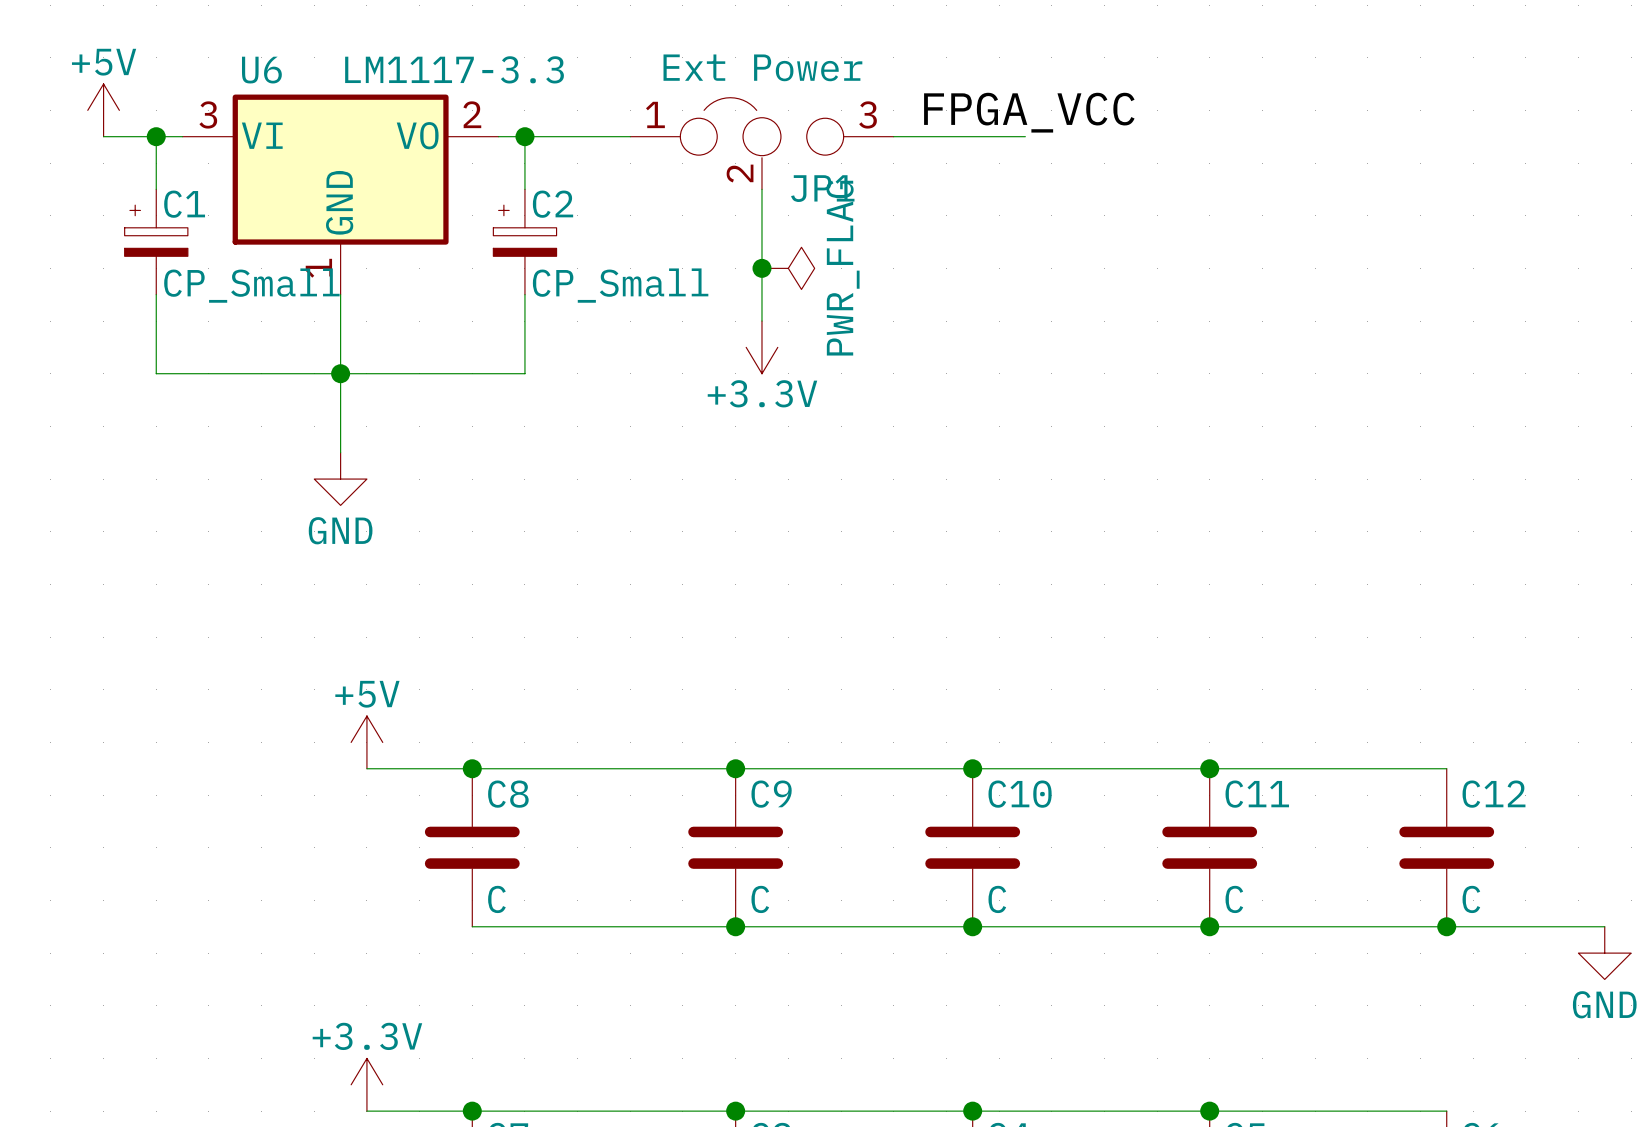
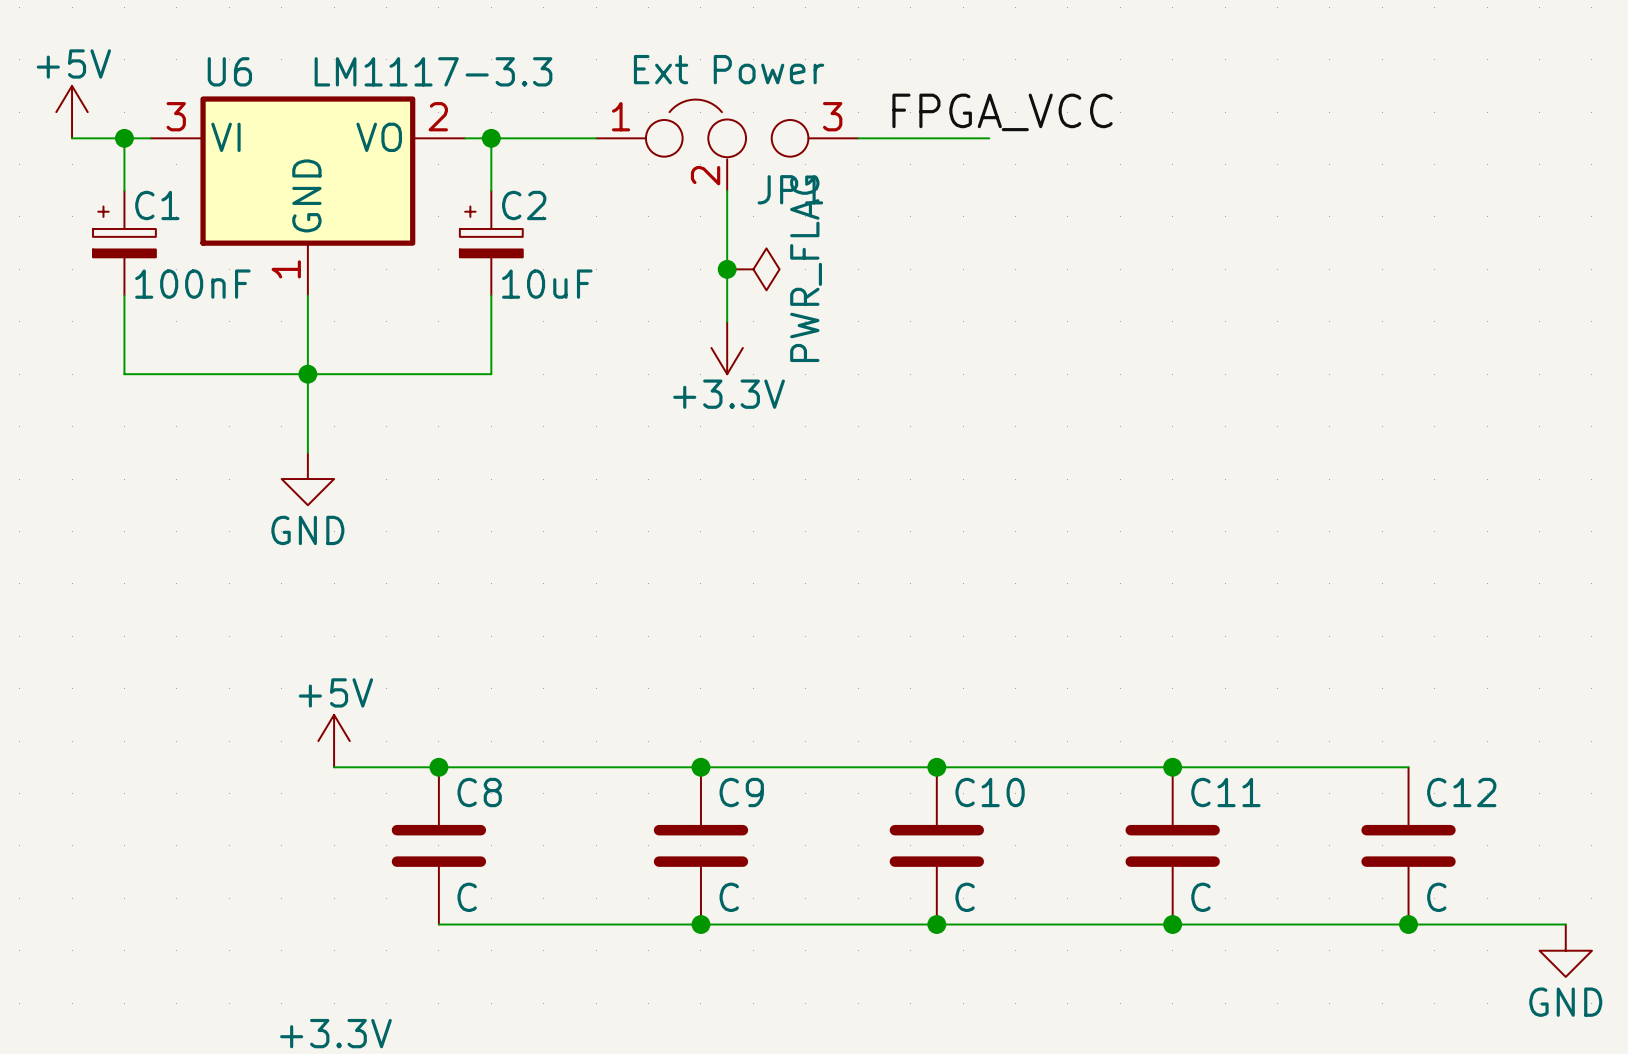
C1 value: CP_Small (251, 285) -> 100nF (192, 284)
C2 value: CP_Small (620, 285) -> 10uF (547, 284)

